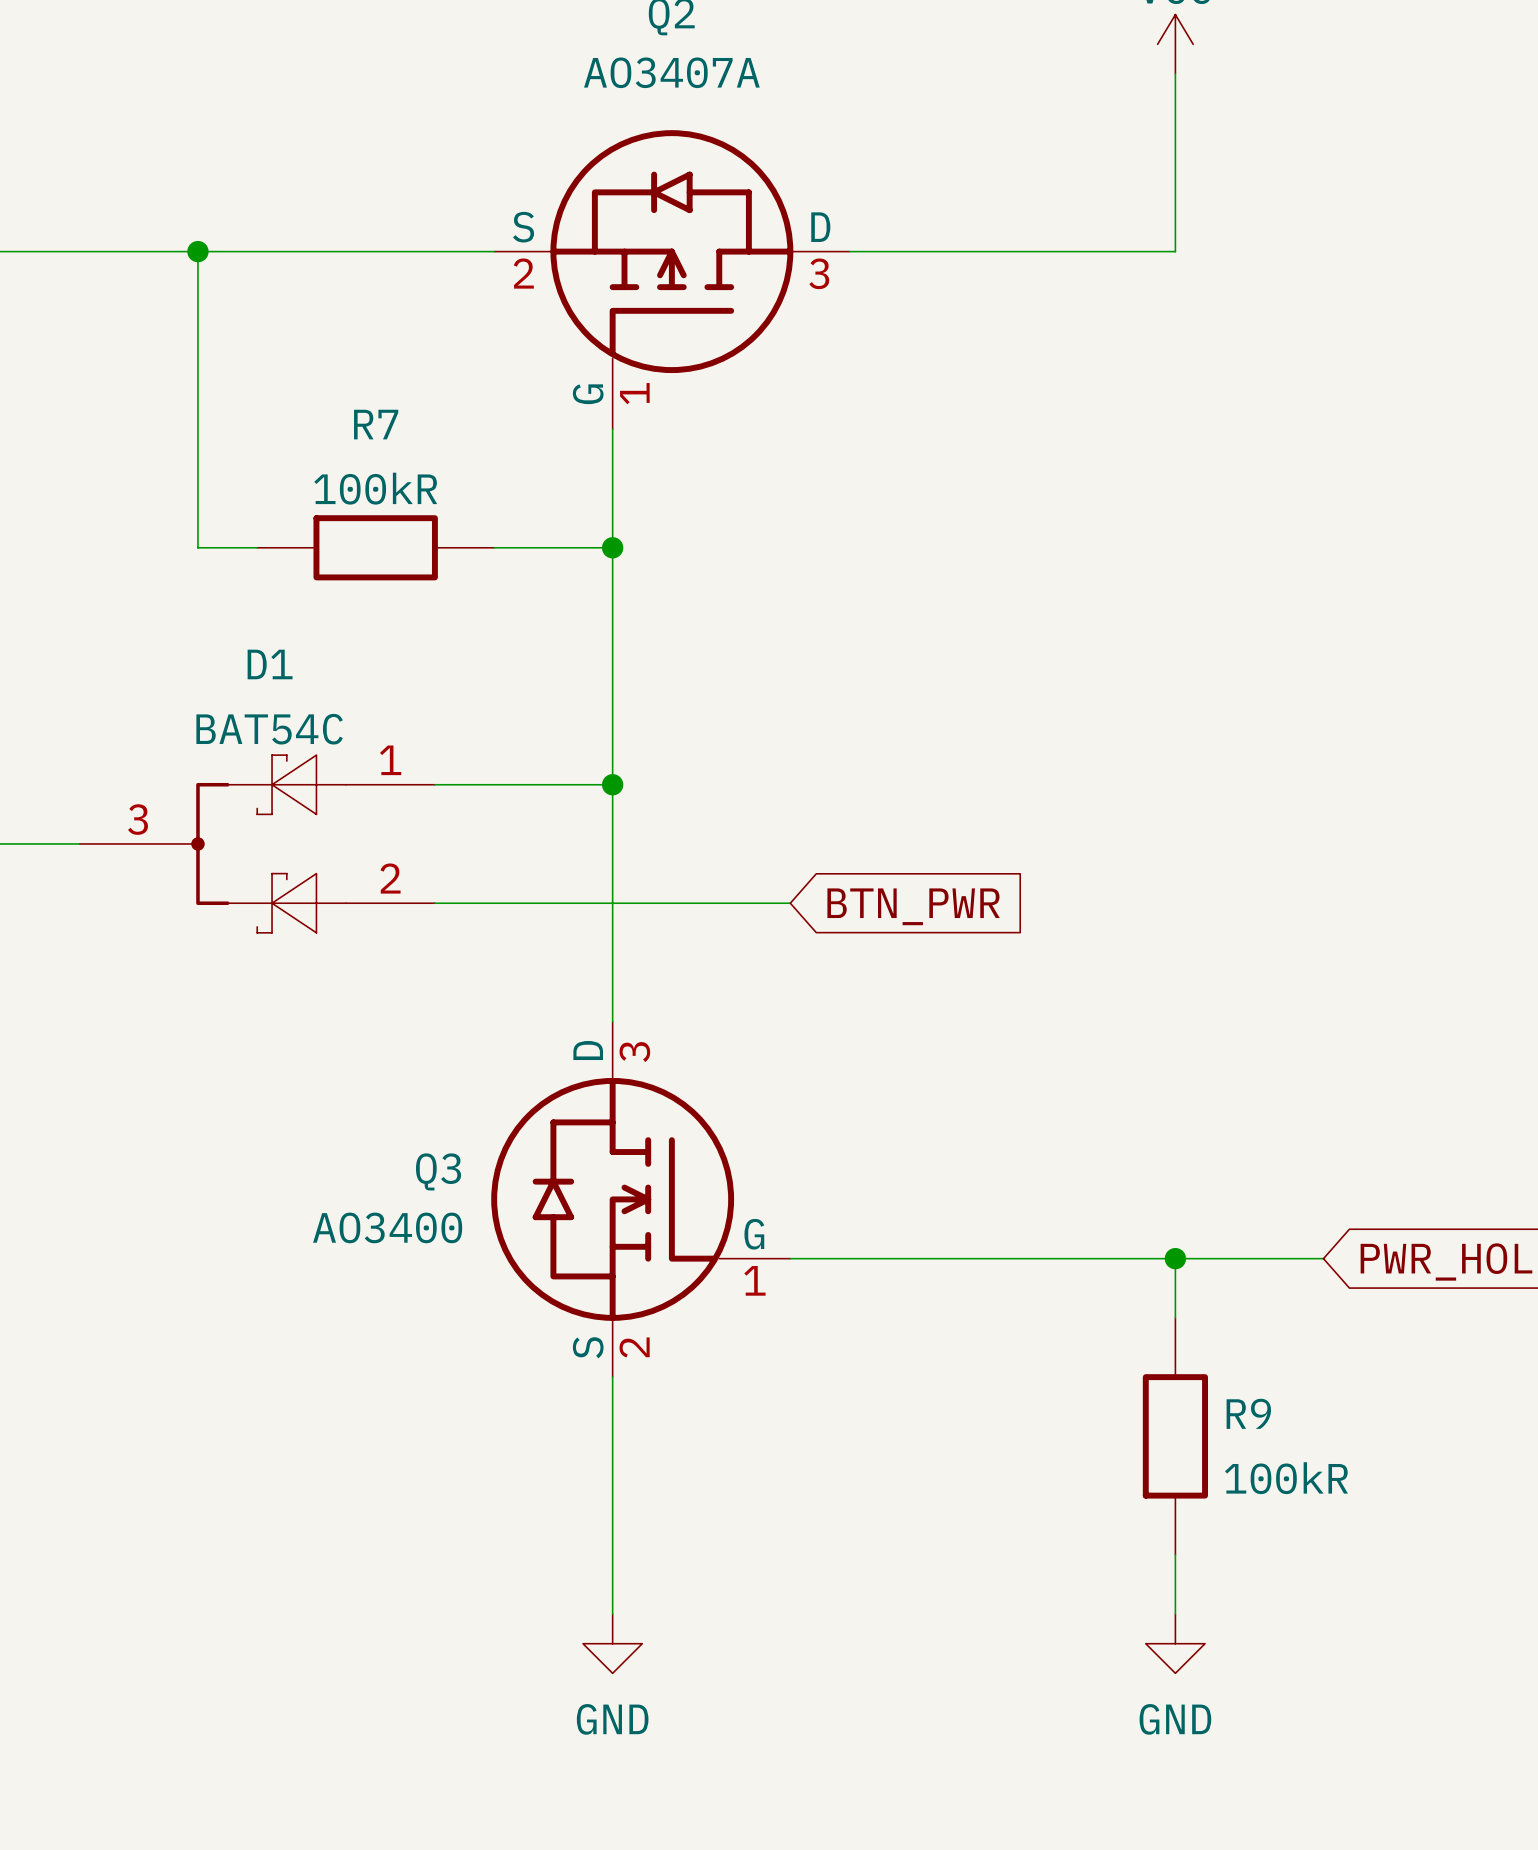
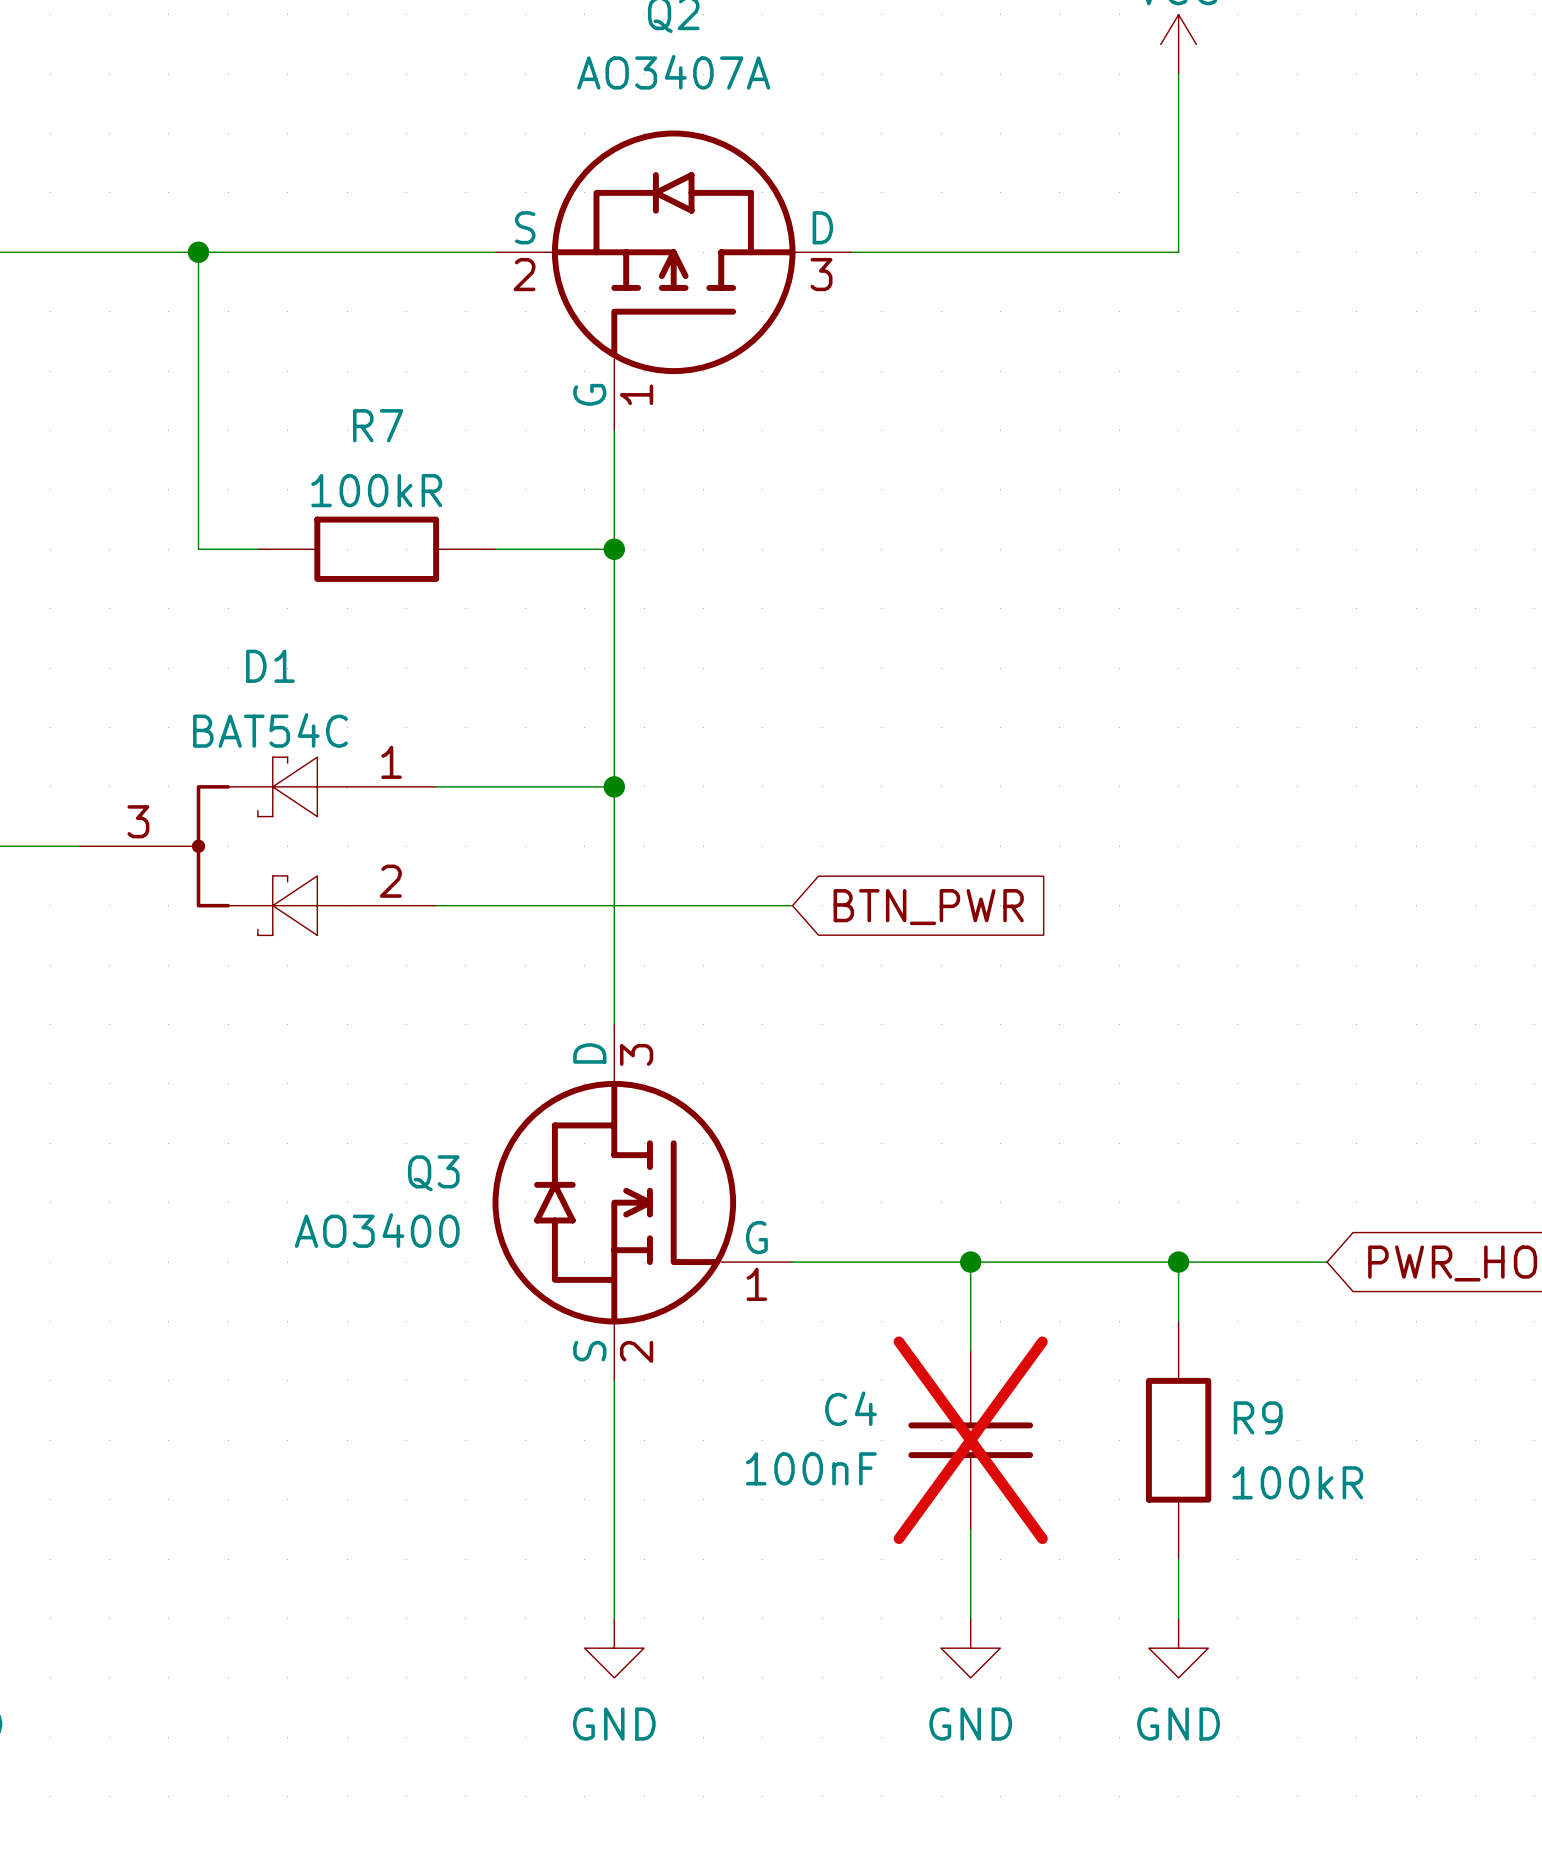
wire: none -> (970, 1262) (970, 1351)
junction: none -> (970, 1262)
C4: none -> 100nF (970, 1440)
wire: none -> (970, 1529) (970, 1618)
power symbol: none -> GND (970, 1648)

